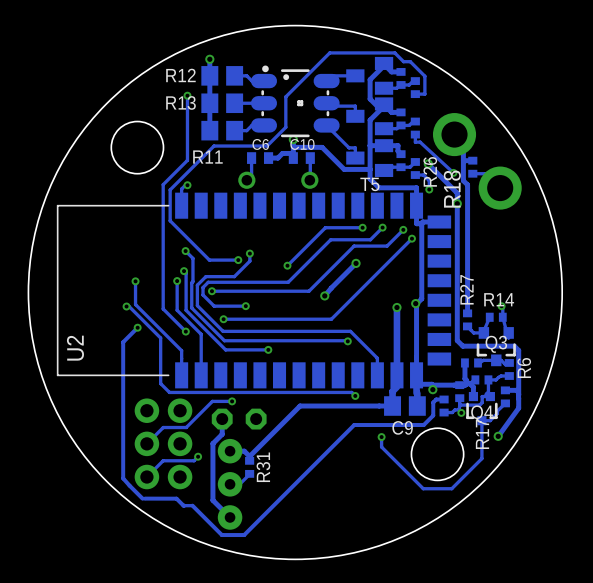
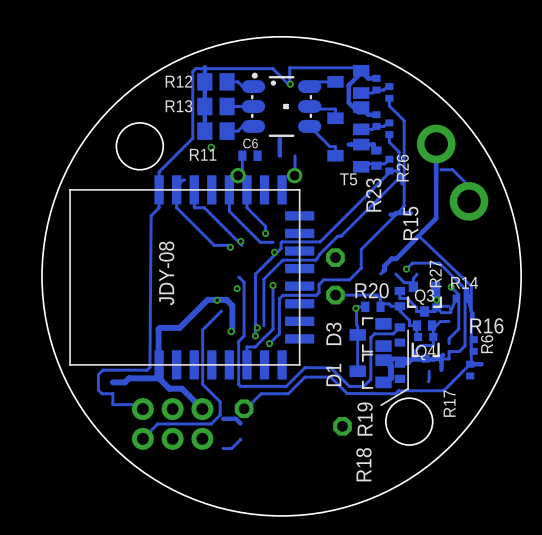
via: (209, 59) -> none
track: none -> (361, 70) (358, 67) (289, 67) (289, 85) (272, 68) (195, 68) (192, 71) (192, 138) (159, 171) (159, 207) (151, 215) (149, 367) (147, 370) (102, 370) (98, 374) (98, 390) (102, 393) (112, 393) (112, 404) (138, 404) (142, 409)
via: none -> (290, 84)
track: (415, 94) (424, 94) (424, 76) (410, 61) (403, 61) (394, 52) (329, 52) (285, 96) (285, 127) (267, 146) (214, 146) (170, 189) (170, 220) (209, 260) (238, 260) -> none
track: (187, 95) (187, 160) (163, 184) (163, 308) (185, 331) -> none
via: (187, 95) -> none
track: none -> (389, 100) (389, 106) (404, 120) (404, 205) (361, 249) (361, 268) (349, 279) (323, 279) (319, 284) (319, 292) (316, 295) (282, 295) (279, 298) (279, 333) (269, 343)
track: (380, 109) (370, 120) (370, 178) (378, 187) (416, 187) (416, 223) -> none
track: (454, 134) (463, 143) (463, 180) (467, 184) -> (436, 143) (436, 179)
part position: (454, 134) -> (436, 143)
via: (293, 139) -> none
track: (415, 142) (420, 142) (453, 172) -> (389, 141) (399, 151) (399, 178) (341, 236) (337, 236) (315, 260) (282, 260) (263, 279) (263, 325)
track: (293, 147) (322, 147) (344, 169) (370, 169) -> none
via: none -> (211, 147)
track: (293, 153) (282, 153) (277, 158) (268, 158) -> none
R18 footprint: [468, 156, 478, 178] -> [394, 359, 406, 383]
C10: (301, 158) -> none
part: (401, 160) -> none
R23: none -> (376, 158)
track: (428, 163) (457, 193) (457, 340) (462, 346) (514, 346) (518, 350) (518, 408) (498, 436) -> none
via: (428, 163) -> none
via: (453, 172) -> none
track: none -> (389, 172) (320, 241) (281, 242) (281, 248) (255, 274) (255, 335)
via: (187, 185) -> none
part position: (500, 188) -> (469, 201)
via: (429, 189) -> none
R18 name position: R18 (452, 189) -> R18 (363, 464)
track: none -> (176, 189) (176, 207) (214, 245) (227, 245)
track: none -> (194, 189) (194, 207) (204, 207) (242, 245)
track: none -> (229, 189) (229, 211) (260, 242) (273, 242)
track: none -> (246, 189) (246, 207) (265, 226) (265, 233)
via: (457, 203) -> none
track: (421, 223) (421, 298) (416, 304) -> none
track: (362, 227) (325, 227) (287, 265) -> none
via: (362, 227) -> none
track: (382, 227) (370, 239) (330, 239) (288, 282) (208, 282) (203, 287) (203, 294) (214, 306) (245, 306) -> none
via: (382, 227) -> none
track: (467, 227) (467, 313) -> (436, 218) (418, 235)
track: (403, 229) (387, 246) (354, 246) (308, 291) (211, 291) -> none
via: (403, 229) -> none
track: (411, 238) (331, 319) (223, 319) -> none
via: (411, 238) -> none
via: none -> (265, 233)
track: none -> (418, 235) (471, 286) (471, 363) (443, 390) (398, 390) (395, 393) (347, 393) (330, 377) (305, 377) (288, 393) (261, 393) (244, 410) (244, 408)
track: none -> (418, 235) (396, 258) (391, 258) (384, 265) (384, 269) (380, 274)
track: (185, 251) (192, 258) (191, 308) (224, 340) (347, 341) -> none
via: (185, 251) -> none
track: (249, 253) (249, 261) (234, 276) (205, 276) (197, 285) (197, 305) (223, 331) (350, 331) (377, 358) (377, 375) -> none
track: (356, 263) (324, 295) -> none
via: (356, 263) -> none
track: (184, 271) (186, 273) (186, 310) (225, 349) (268, 349) -> none
via: (184, 271) -> none
part: none -> (335, 257)
track: (135, 281) (135, 304) (181, 350) (181, 375) -> none
via: (135, 281) -> none
track: (177, 281) (177, 310) (201, 334) (201, 375) -> none
via: (177, 281) -> none
track: none -> (406, 269) (412, 263) (439, 263) (465, 288) (465, 345) (459, 351) (449, 351) (449, 358) (425, 358)
via: none -> (406, 269)
track: none -> (395, 274) (404, 282) (413, 282)
track: none -> (416, 274) (413, 278) (413, 286)
U2: (253, 290) -> none
via: (211, 291) -> none
JDY-08: none -> (191, 277)
track: none -> (238, 277) (244, 282) (244, 336) (238, 341) (238, 384) (240, 386) (286, 386) (305, 367) (330, 367) (349, 386) (363, 386) (370, 379) (370, 337) (374, 333) (393, 333) (399, 327)
via: (324, 295) -> none
track: none -> (273, 285) (273, 329) (255, 346) (246, 346) (246, 364)
via: none -> (273, 285)
via: (415, 303) -> none
track: (416, 304) (416, 384) -> none
track: none -> (451, 287) (458, 294) (458, 328) (449, 338) (449, 343)
track: (126, 306) (129, 306) (160, 338) (160, 383) (169, 392) (351, 392) (355, 395) -> none
via: (126, 306) -> none
via position: (501, 306) -> (451, 287)
track: (396, 307) (396, 386) (392, 391) (392, 406) (300, 406) (249, 456) (249, 460) -> none
via: (396, 307) -> none
track: none -> (399, 291) (399, 298) (407, 298) (416, 307) (416, 311) (435, 311) (440, 306) (449, 306)
track: none -> (335, 295) (377, 295) (380, 298) (380, 306)
part: none -> (335, 295)
R15: none -> (399, 298)
via: none -> (436, 300)
track: none -> (380, 303) (399, 306) (400, 311) (409, 320) (409, 325) (416, 325) (418, 336)
track: none -> (365, 306) (356, 308) (357, 371)
R20: none -> (372, 306)
track: (137, 327) (123, 342) (123, 478) (142, 498) (176, 498) (183, 505) -> none
via: (137, 327) -> none
via: (185, 331) -> none
track: none -> (221, 311) (202, 329) (202, 384) (220, 401) (220, 415) (211, 423) (157, 423) (142, 438)
via position: (347, 341) -> (355, 308)
track: none -> (449, 321) (440, 321) (433, 328) (433, 345) (420, 345) (415, 351) (415, 357) (409, 363) (399, 363)
Q3 position: (496, 346) -> (424, 299)
R16: none -> (424, 325)
line: none -> (408, 330) (408, 388) (381, 405)
track: none -> (231, 331) (232, 305) (226, 299) (207, 299) (179, 327) (159, 327) (159, 378)
via: none -> (231, 331)
D3: none -> (370, 334)
R19: none -> (399, 334)
via: none -> (255, 335)
track: (464, 362) (466, 383) -> none
part: (471, 362) -> none
track: (509, 362) (505, 364) (501, 360) (483, 360) (478, 362) -> none
via: none -> (269, 343)
track: (509, 376) (501, 376) (496, 379) (488, 379) (488, 392) (486, 396) -> none
part: (481, 379) -> none
via: (432, 389) -> none
part: (459, 391) -> none
via: (355, 395) -> none
track: (490, 396) (482, 396) (482, 402) (479, 405) (459, 405) -> none
D1: none -> (370, 371)
track: (444, 399) (436, 399) (433, 402) (433, 415) (423, 425) (354, 425) (244, 535) (221, 535) (192, 505) (183, 505) -> none
track: (232, 401) (212, 401) (186, 427) (163, 427) (146, 443) -> none
via: (232, 401) -> none
track: (505, 403) (490, 420) (481, 420) (481, 458) (451, 488) (423, 488) (381, 447) (381, 437) -> none
track: none -> (159, 378) (169, 388) (181, 388) (202, 409)
track: none -> (159, 378) (128, 378) (124, 382) (112, 382)
C9: (404, 406) -> none
part: (444, 406) -> none
Q4 position: (481, 408) -> (425, 347)
track: (444, 412) (459, 409) (461, 412) -> none
via: (461, 412) -> none
track: (222, 419) (222, 434) (212, 443) (212, 500) (230, 517) -> none
part: (222, 419) -> none
part: (256, 419) -> none
via: (498, 436) -> none
via: (381, 437) -> none
part: none -> (244, 408)
part rotation: 0° (163, 443) -> 90° clockwise (172, 423)
track: (198, 456) (194, 460) (163, 460) (146, 477) -> none
via: (198, 456) -> none
part: none -> (342, 426)
R31: (249, 467) -> none
part: (230, 484) -> none

